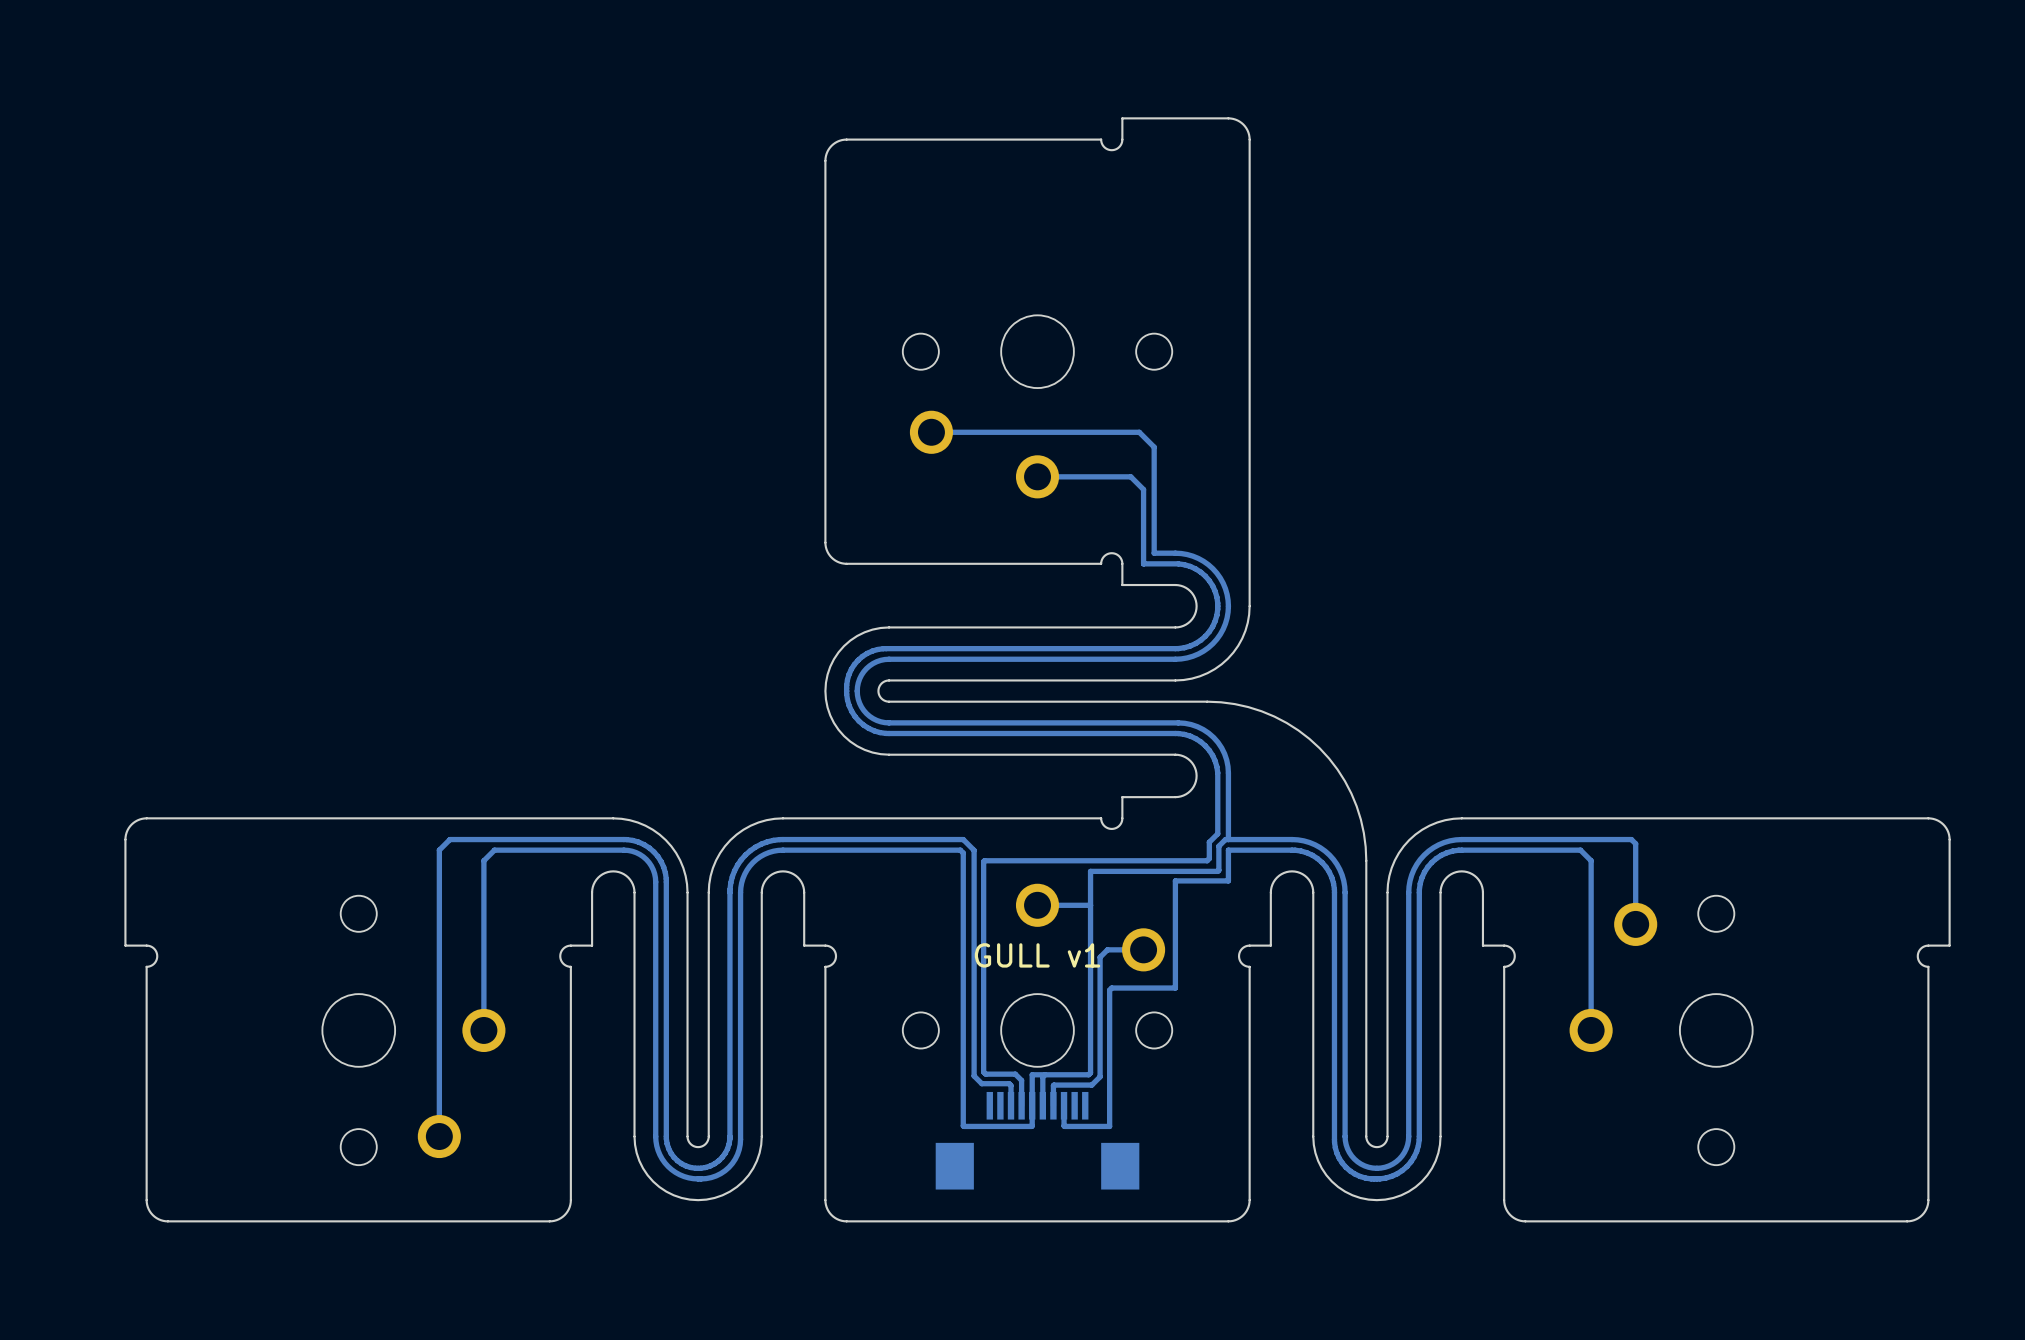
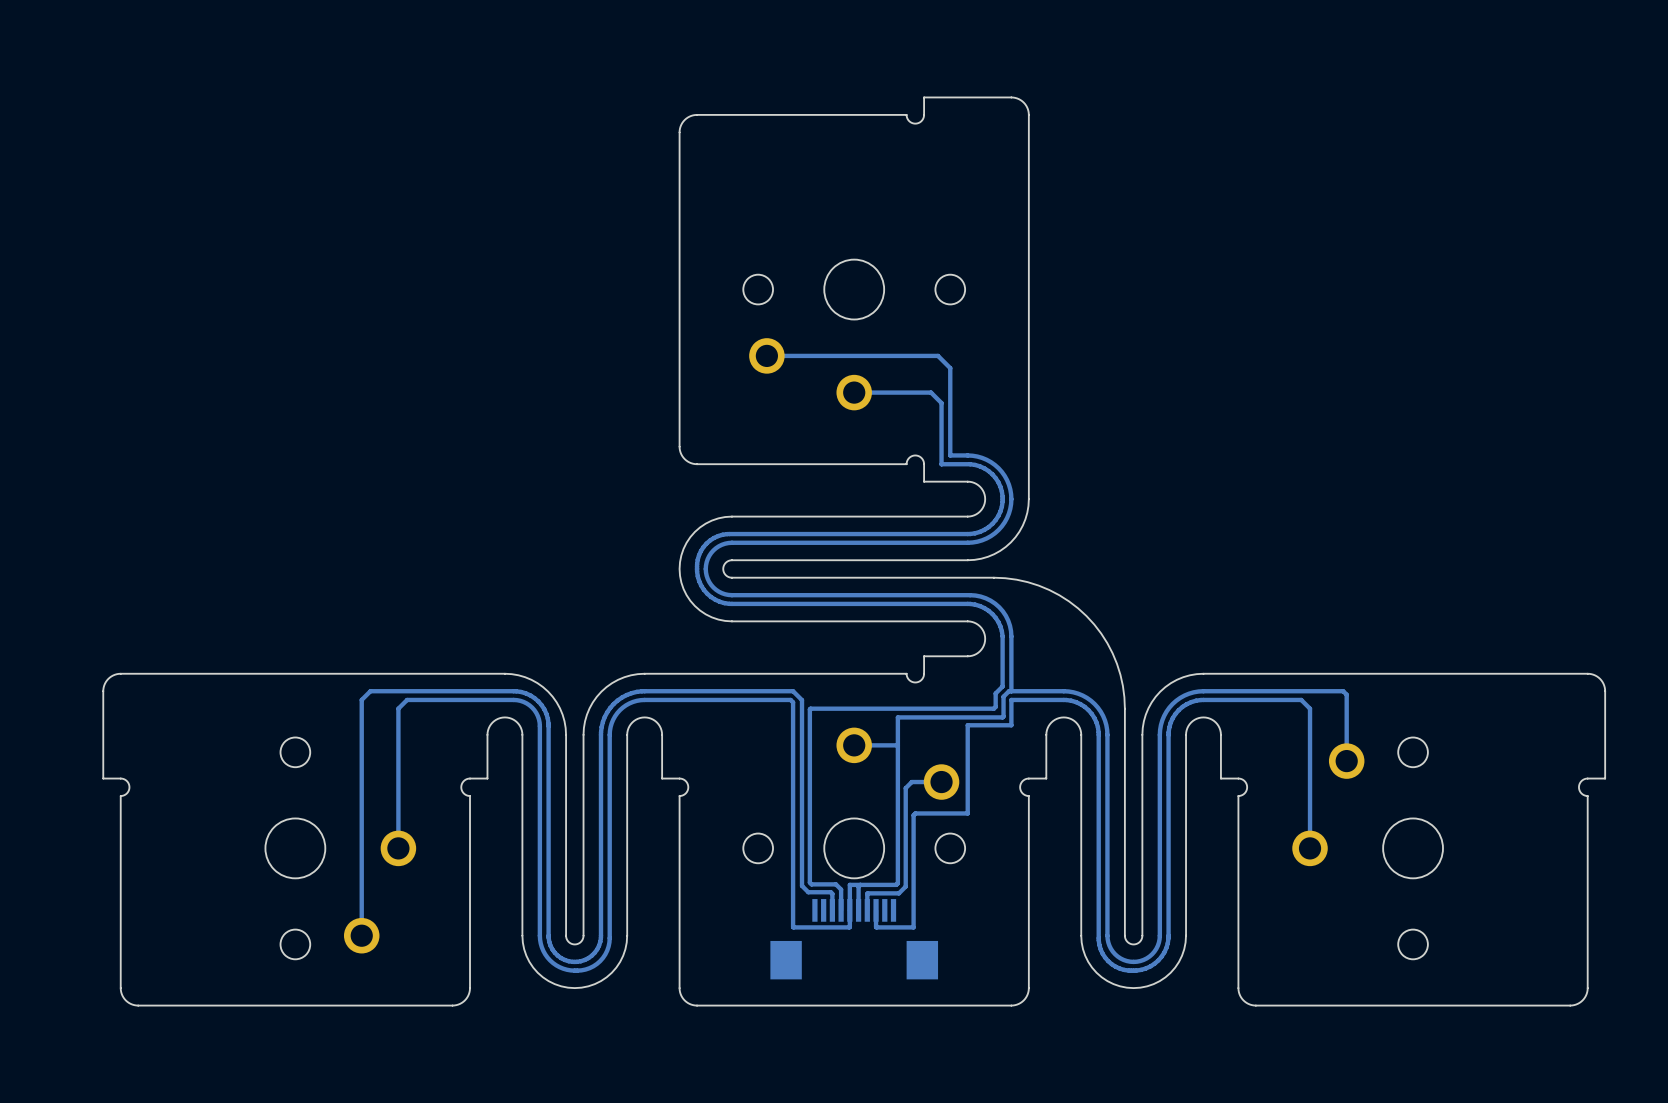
text: GULL v1 (1037, 955) -> none

